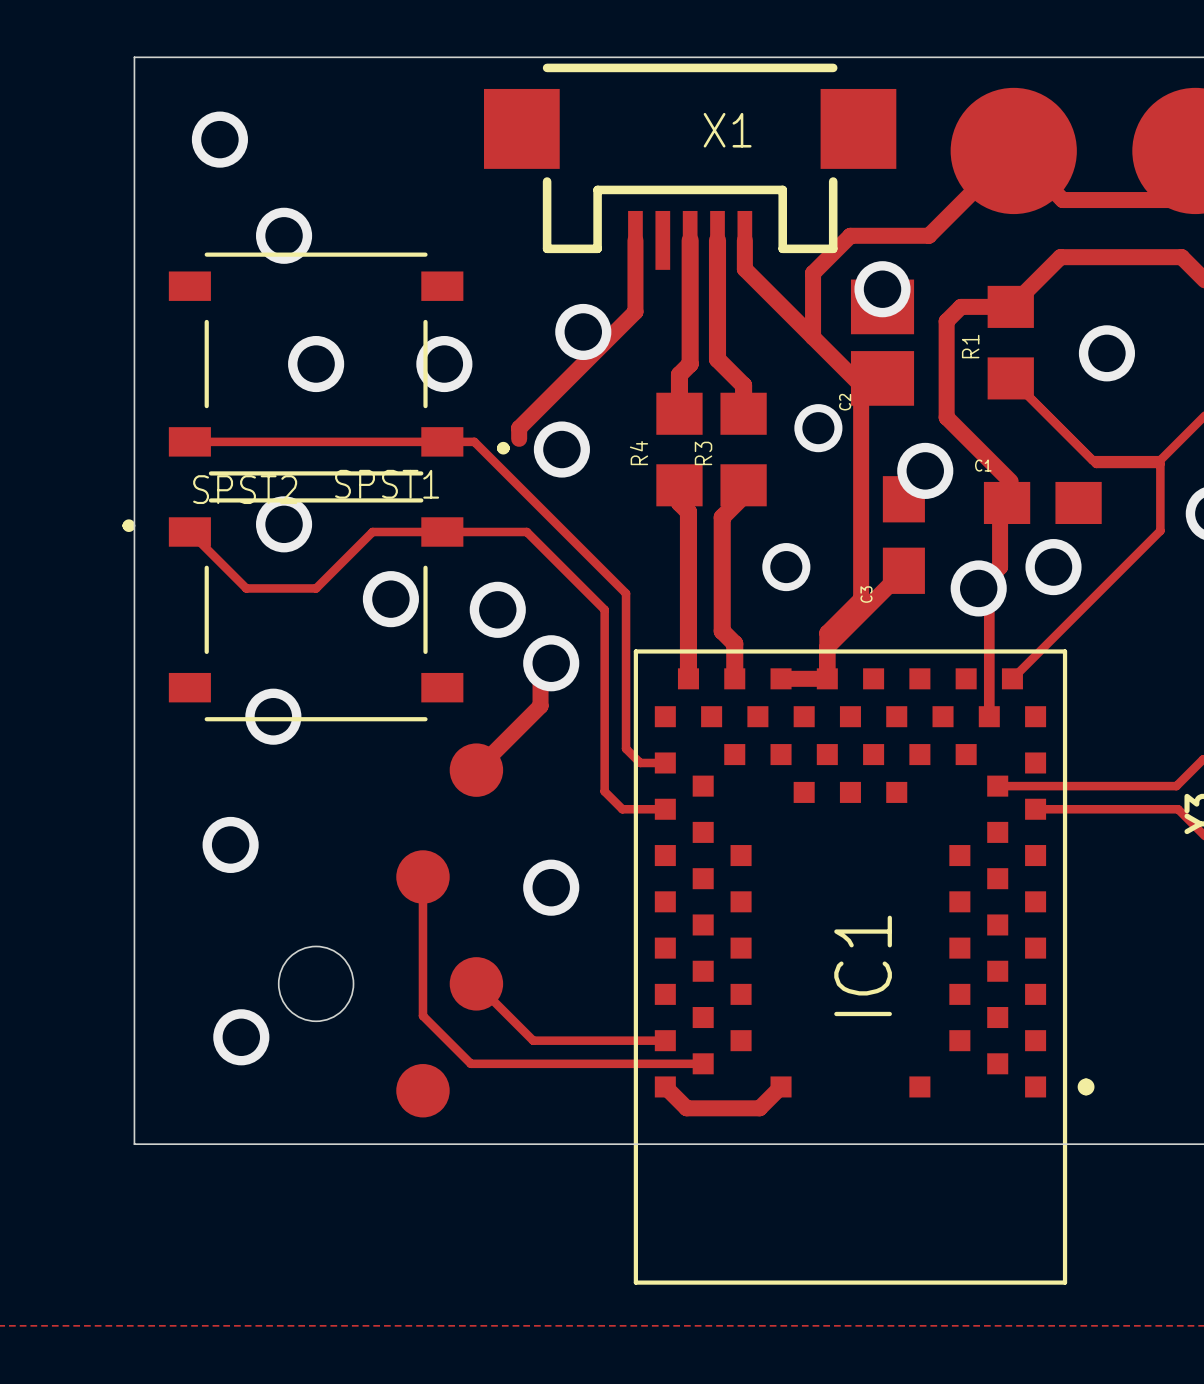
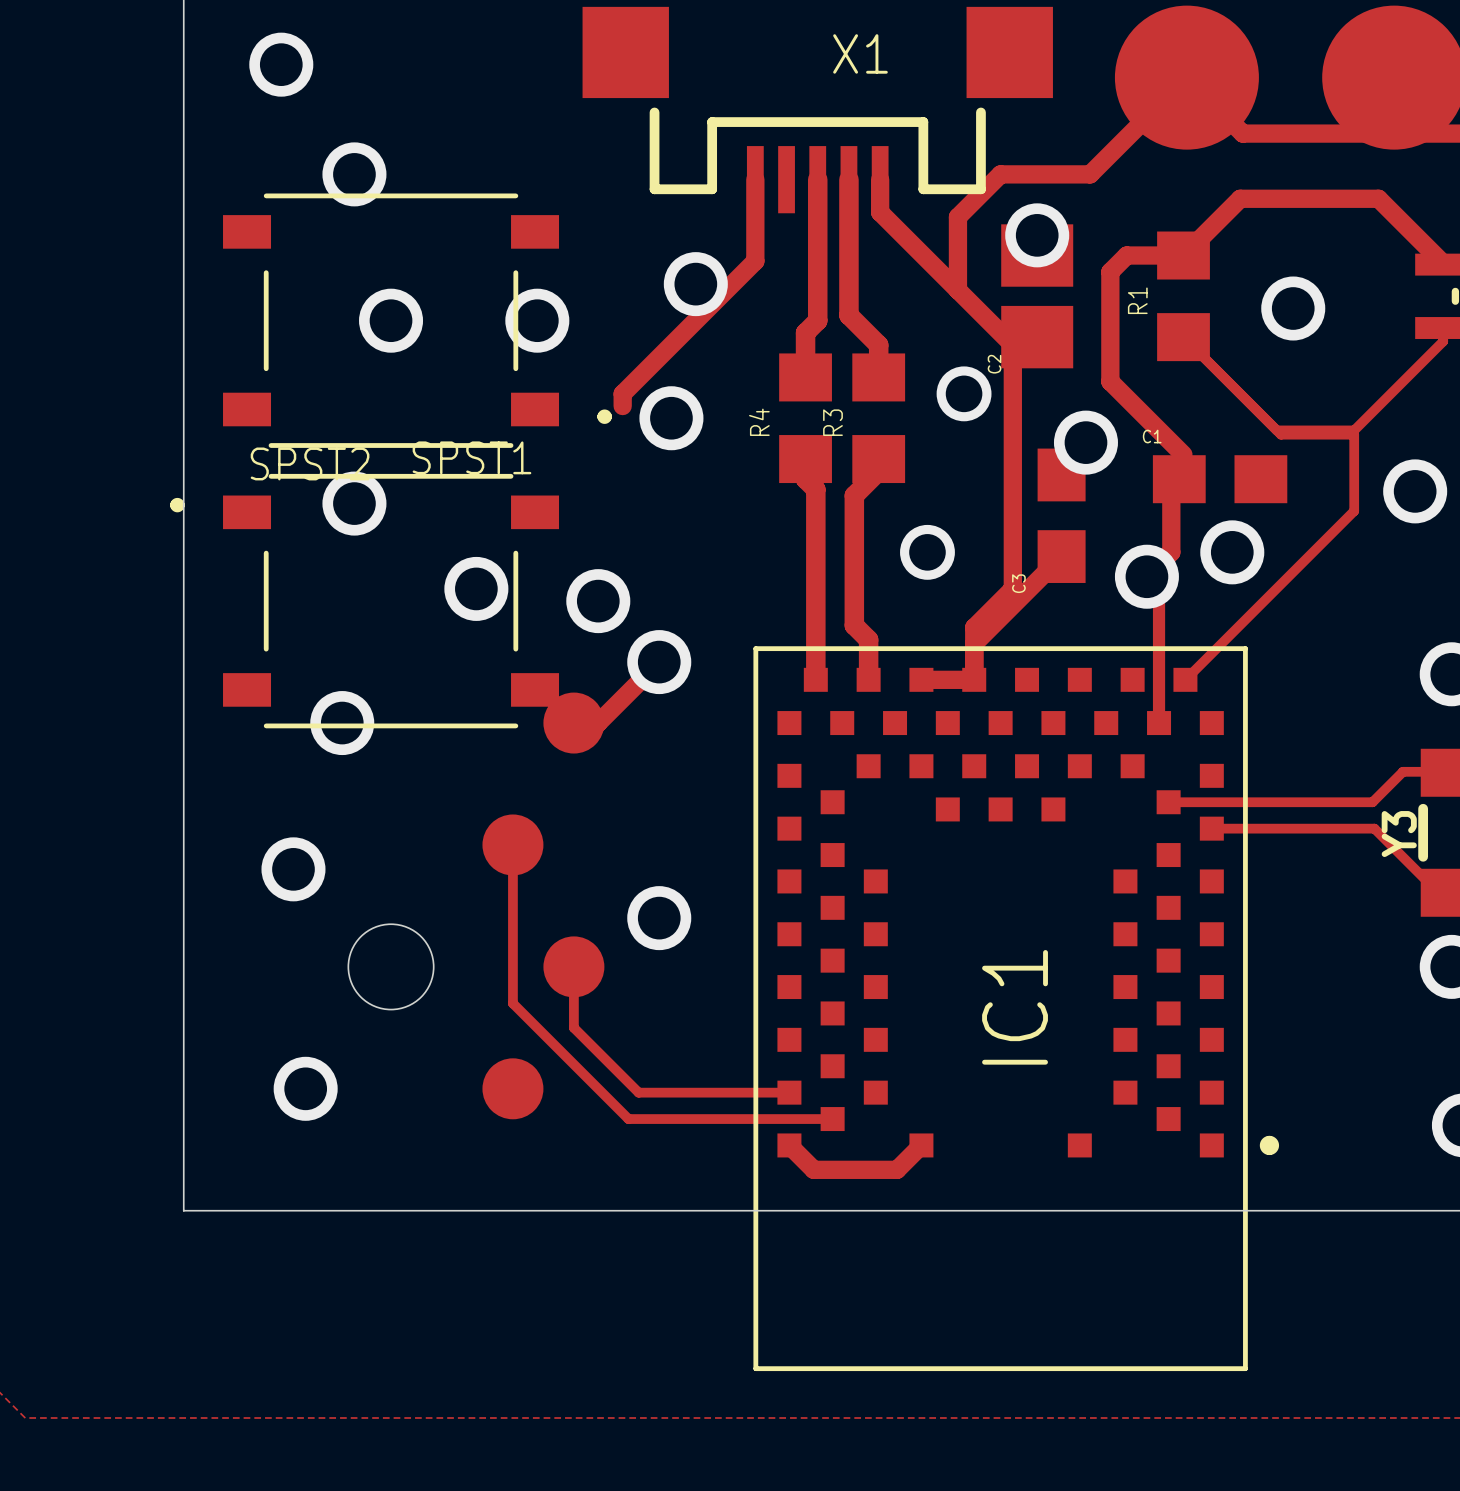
track: (189, 441) (474, 441) (626, 593) (626, 748) (640, 762) (665, 762) -> none
track: (189, 531) (246, 588) (316, 588) (372, 531) (526, 531) (604, 609) (604, 791) (622, 809) (665, 809) -> none
track: (540, 673) (540, 706) (476, 770) -> (647, 674) (598, 723) (573, 723)
track: none -> (512, 844) (512, 905)
part position: (390, 930) -> (476, 905)
track: none -> (573, 966) (573, 1027)
track: (422, 962) (422, 1015) (470, 1063) (524, 1063) -> (512, 1003) (628, 1119)

